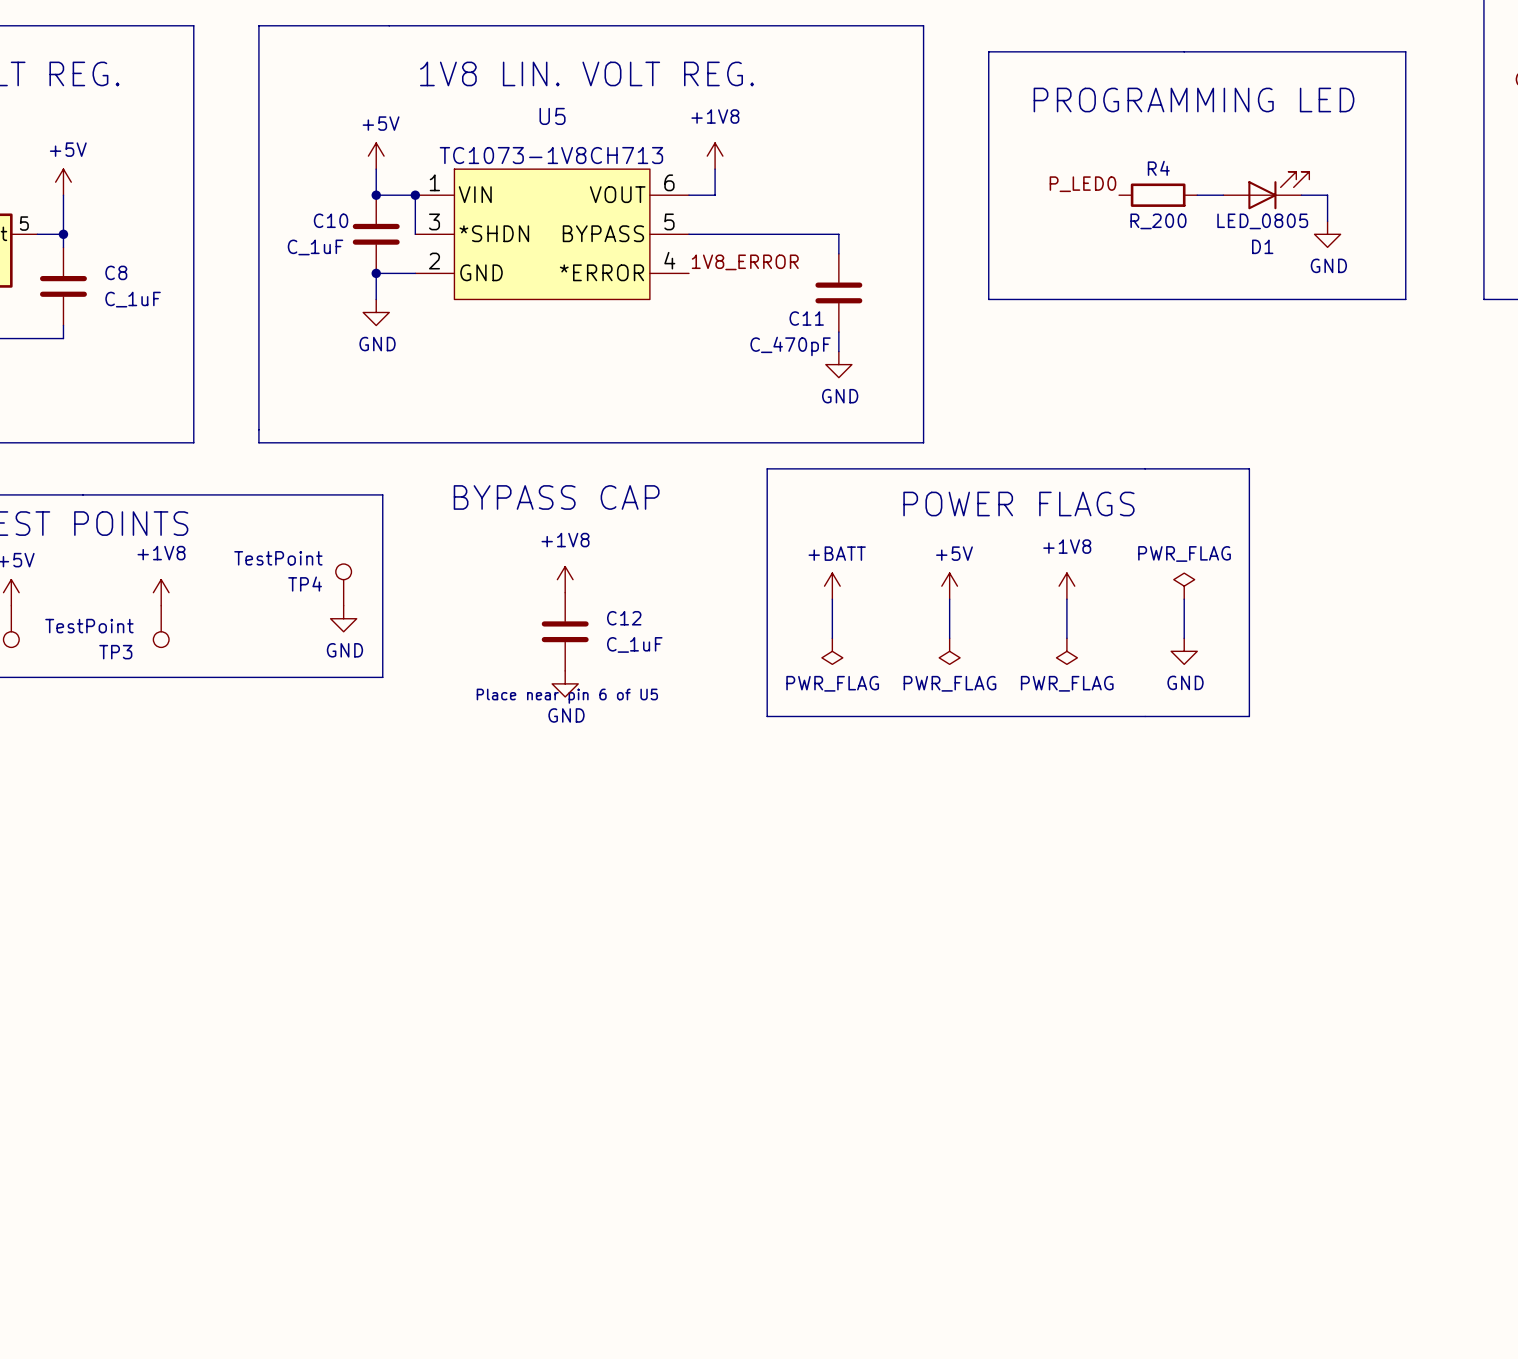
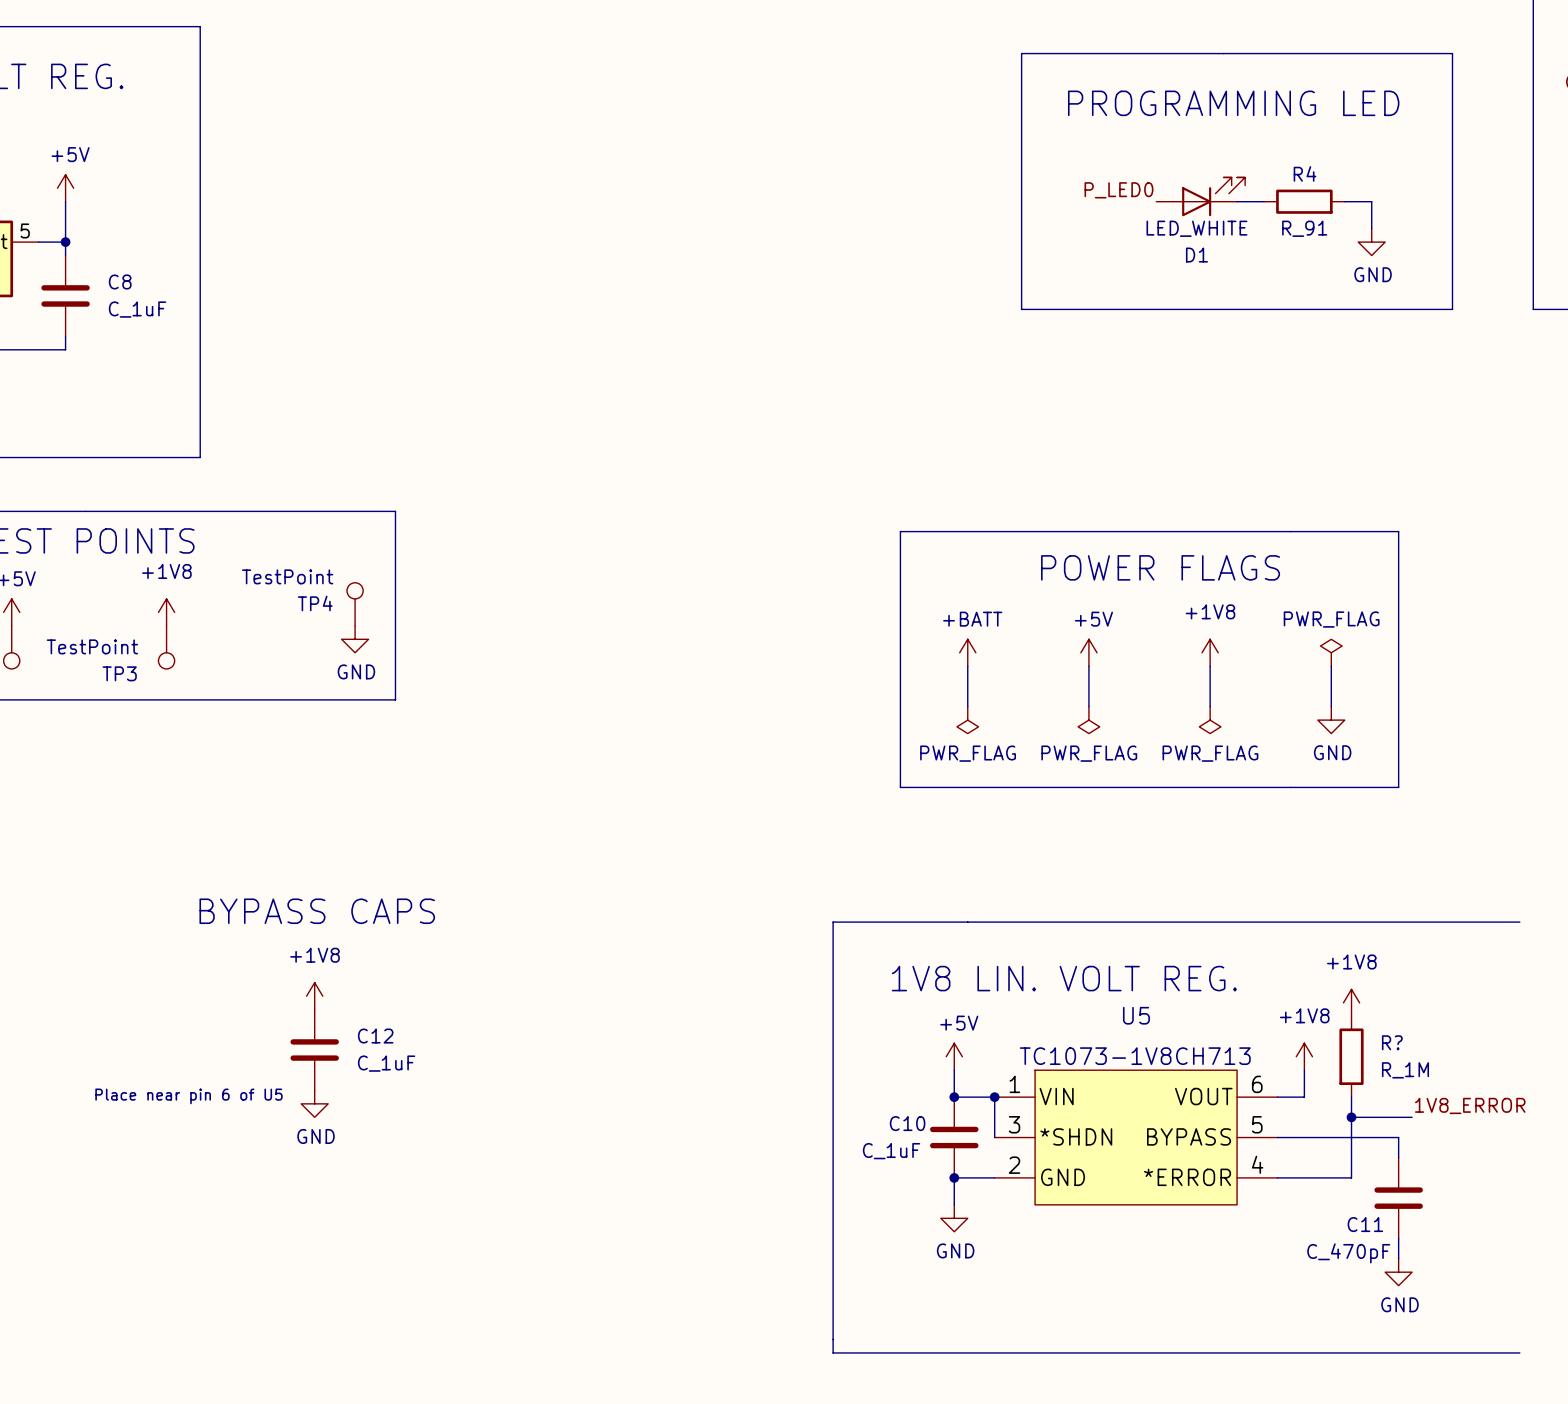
line: (258, 25) (258, 442) (923, 442) (923, 25) (258, 25) -> none
text: 1V8 LIN. VOLT REG. (587, 73) -> none
power symbol: +5V (376, 156) -> none
power symbol: +1V8 (715, 156) -> none
wire: (376, 169) (376, 195) (415, 195) (415, 234) -> none
wire: (715, 169) (715, 195) (689, 195) -> none
D1 position: (1266, 190) -> (1200, 196)
junction: (376, 195) -> none
junction: (415, 195) -> none
R4 position: (1158, 195) -> (1304, 201)
R4 value: R_200 (1158, 221) -> R_91 (1304, 228)
D1 value: LED_0805 (1262, 221) -> LED_WHITE (1196, 228)
C10 position: (376, 234) -> (954, 1137)
U5 position: (552, 234) -> (1136, 1137)
wire: (689, 234) (838, 234) (838, 253) -> none
label: 1V8_ERROR (745, 262) -> none
junction: (376, 273) -> none
wire: (415, 273) (376, 273) (376, 299) -> none
C11 position: (838, 292) -> (1398, 1198)
power symbol: GND (376, 312) -> none
wire: (838, 332) (838, 351) -> none
power symbol: GND (838, 364) -> none
line: (767, 468) (1249, 468) (1249, 716) (767, 716) (767, 468) -> (900, 531) (1398, 531) (1398, 787) (900, 787) (900, 531)
text: BYPASS CAP (556, 497) -> none
text position: POWER FLAGS (1018, 504) -> POWER FLAGS (1160, 567)
power symbol: +1V8 (565, 579) -> none
power symbol position: +BATT (832, 586) -> +BATT (967, 652)
power symbol position: +5V (949, 586) -> +5V (1088, 652)
power symbol position: +1V8 (1066, 586) -> +1V8 (1210, 652)
power symbol: PWR_FLAG (1184, 586) -> none
wire: (832, 599) (832, 638) -> (967, 666) (967, 706)
wire: (949, 599) (949, 638) -> (1088, 666) (1088, 706)
wire: (1066, 599) (1066, 638) -> (1210, 666) (1210, 706)
wire: (1184, 599) (1184, 638) -> (1331, 666) (1331, 706)
C12 position: (565, 631) -> (314, 1050)
power symbol: none -> PWR_FLAG (1331, 652)
power symbol: PWR_FLAG (832, 651) -> none
power symbol position: PWR_FLAG (949, 651) -> PWR_FLAG (967, 720)
power symbol position: PWR_FLAG (1066, 651) -> PWR_FLAG (1088, 720)
power symbol position: GND (1184, 651) -> GND (1331, 720)
power symbol: GND (565, 683) -> none
text: Place near pin 6 of U5 (567, 696) -> none
power symbol: none -> PWR_FLAG (1210, 720)
text: none -> BYPASS CAPS (317, 911)
line: none -> (1519, 922) (833, 922) (833, 1352) (1519, 1352)
text: none -> 1V8 LIN. VOLT REG. (1064, 978)
power symbol: none -> +1V8 (314, 996)
power symbol: none -> +1V8 (1351, 1002)
power symbol: none -> +5V (954, 1056)
power symbol: none -> +1V8 (1304, 1056)
R?: none -> R_1M (1351, 1056)
wire: none -> (954, 1070) (954, 1097) (994, 1097) (994, 1137)
wire: none -> (1304, 1070) (1304, 1097) (1277, 1097)
text: none -> Place near pin 6 of U5 (188, 1096)
junction: none -> (954, 1097)
junction: none -> (994, 1097)
wire: none -> (1351, 1097) (1351, 1177) (1277, 1177)
power symbol: none -> GND (314, 1103)
label: none -> 1V8_ERROR (1470, 1105)
wire: none -> (1351, 1117) (1412, 1117)
junction: none -> (1351, 1117)
wire: none -> (1277, 1137) (1398, 1137) (1398, 1157)
junction: none -> (954, 1177)
wire: none -> (994, 1177) (954, 1177) (954, 1204)
power symbol: none -> GND (954, 1218)
wire: none -> (1398, 1238) (1398, 1258)
power symbol: none -> GND (1398, 1272)

